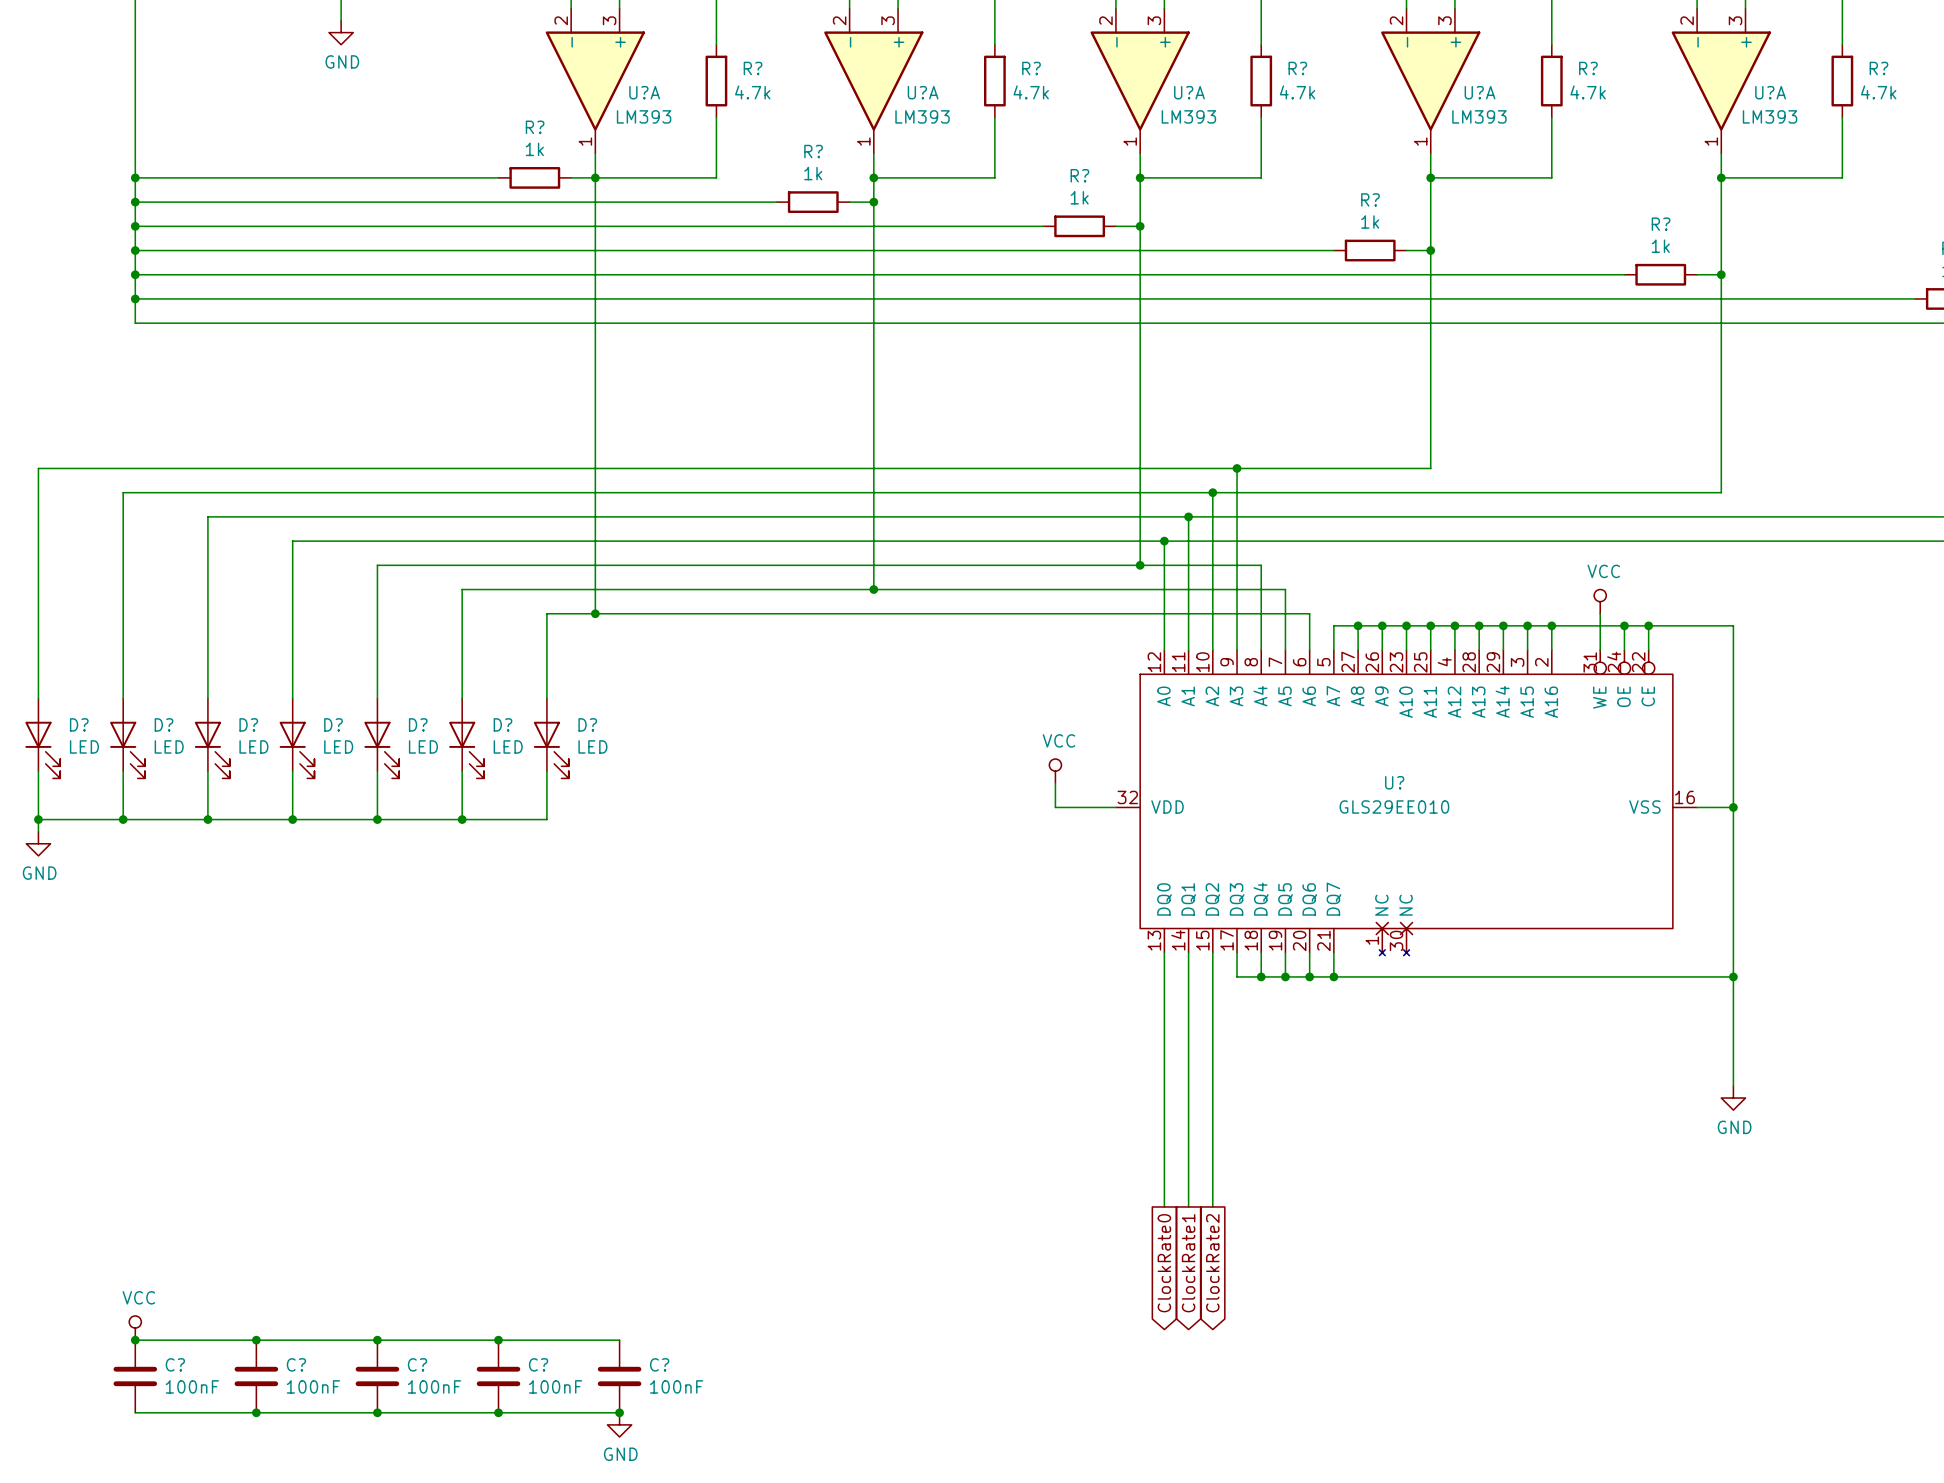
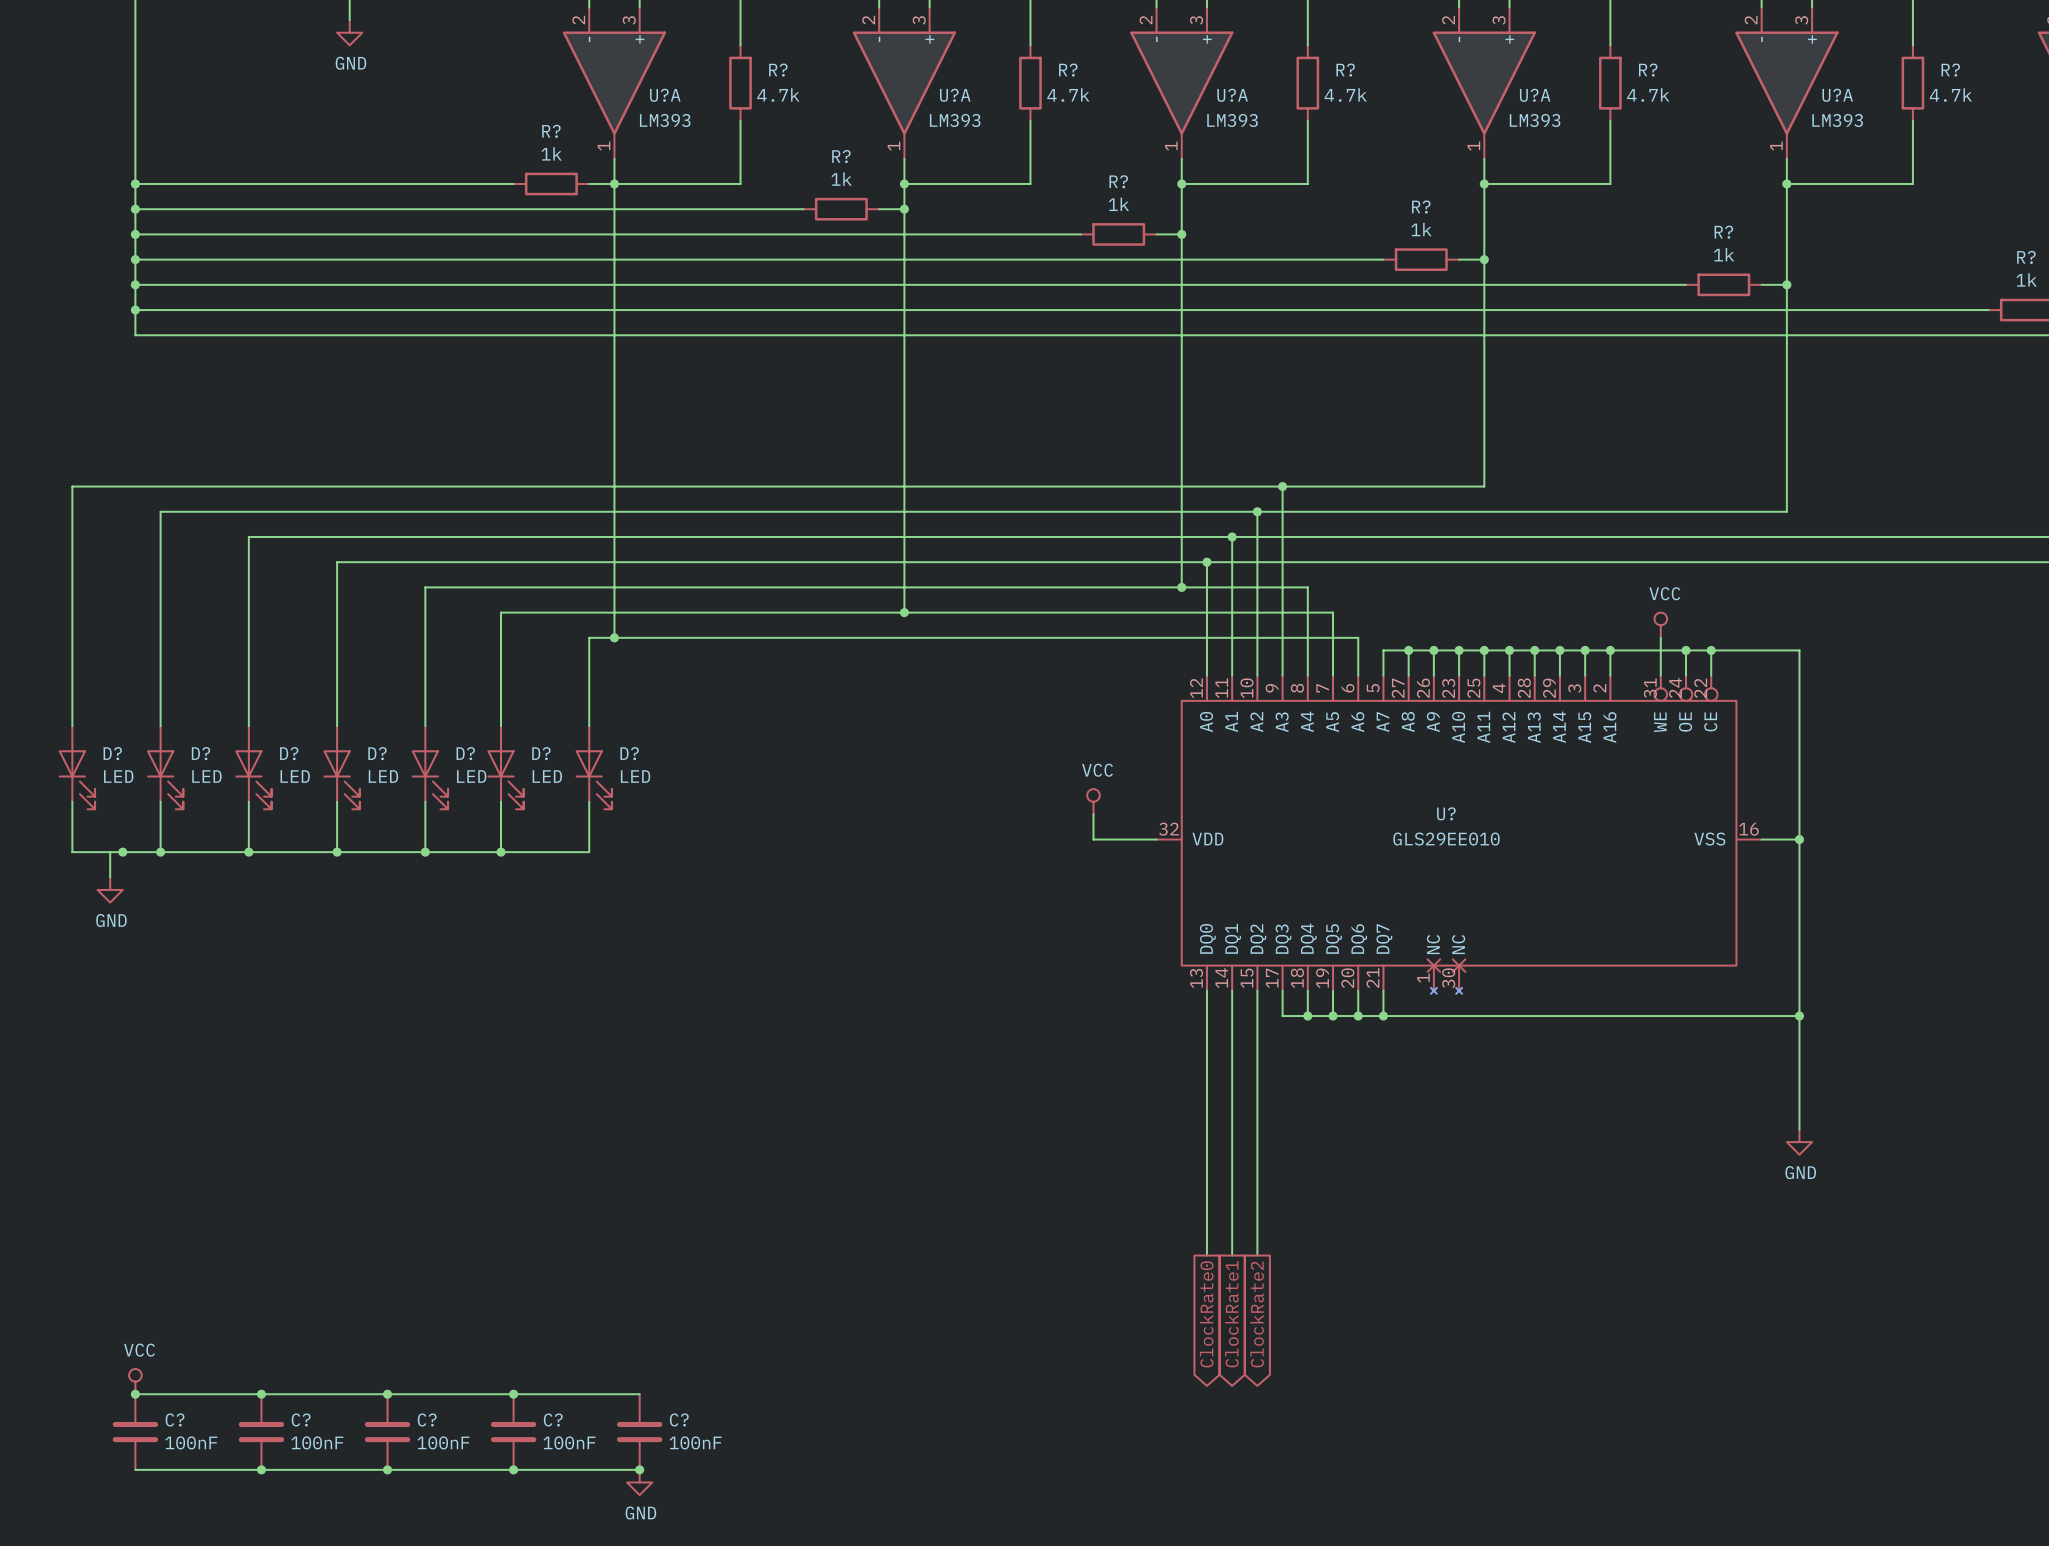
wire: (74, 468) (38, 468) (38, 698) -> (72, 486) (72, 726)
wire: (159, 492) (123, 492) (123, 698) -> (160, 511) (160, 726)
wire: (244, 516) (207, 516) (207, 698) -> (248, 536) (248, 726)
wire: (329, 541) (292, 541) (292, 698) -> (337, 562) (337, 726)
wire: (413, 565) (377, 565) (377, 698) -> (425, 587) (425, 726)
wire: (486, 589) (462, 589) (462, 698) -> (500, 612) (500, 726)
wire: (571, 613) (546, 613) (546, 698) -> (589, 637) (589, 726)
D?: LED (42, 738) -> none
D?: none -> LED (76, 767)
D?: LED (127, 738) -> none
D?: none -> LED (165, 767)
D?: LED (212, 738) -> none
D?: none -> LED (253, 767)
D?: LED (297, 738) -> none
D?: none -> LED (341, 767)
D?: LED (381, 738) -> none
D?: none -> LED (429, 767)
D?: LED (466, 738) -> none
D?: none -> LED (505, 767)
D? position: (551, 738) -> (593, 767)
wire: (38, 771) (38, 831) -> none
wire: (123, 771) (123, 819) -> none
wire: (207, 771) (207, 819) -> (160, 801) (160, 852)
wire: (292, 771) (292, 819) -> (248, 801) (248, 852)
wire: (377, 771) (377, 819) -> (337, 801) (337, 852)
wire: (462, 771) (462, 819) -> (425, 801) (425, 852)
wire: none -> (500, 801) (500, 852)
wire: (546, 771) (546, 819) -> (589, 801) (589, 852) (564, 852)
wire: (38, 819) (74, 819) -> (72, 801) (72, 852)
junction: (38, 819) -> none
wire: none -> (110, 852) (110, 877)
junction: none -> (160, 852)
junction: (207, 819) -> none
junction: none -> (248, 852)
junction: (292, 819) -> none
junction: none -> (337, 852)
junction: (377, 819) -> none
junction: none -> (425, 852)
junction: (462, 819) -> none
junction: none -> (500, 852)
power symbol position: GND (38, 843) -> GND (110, 889)

